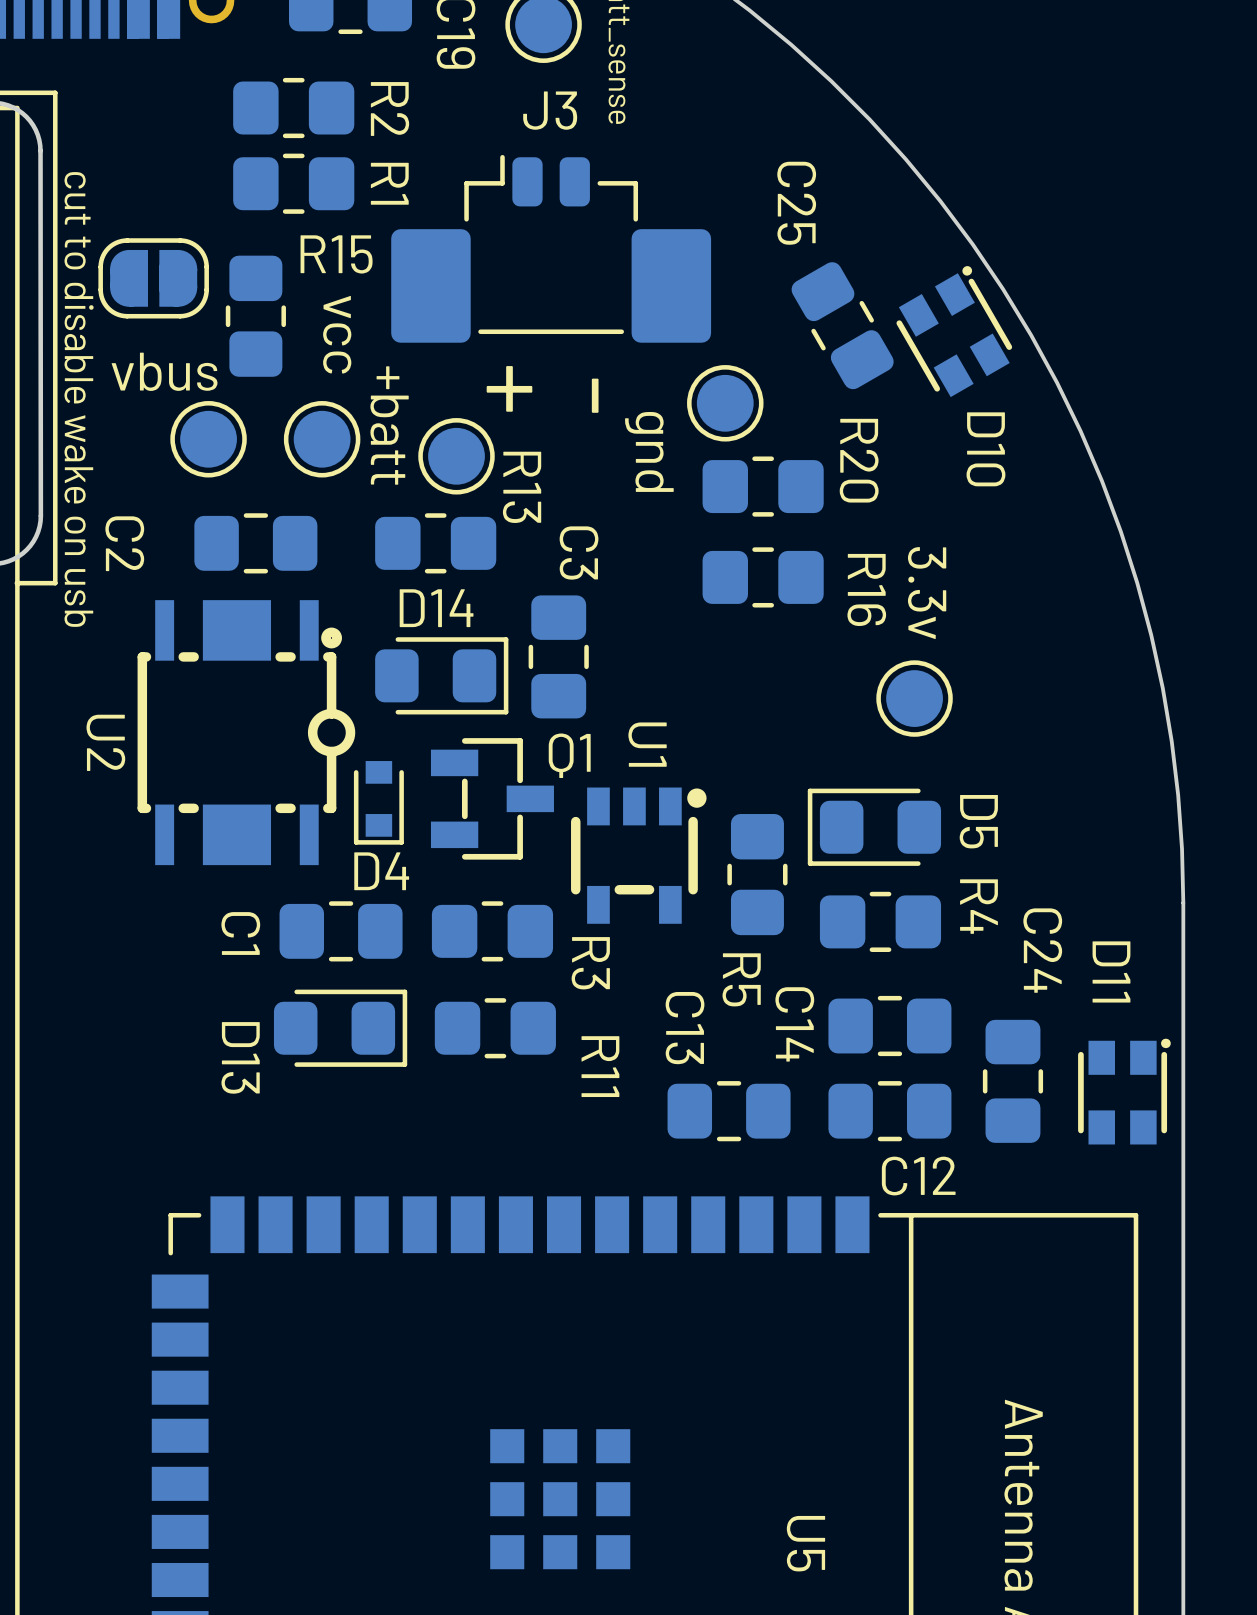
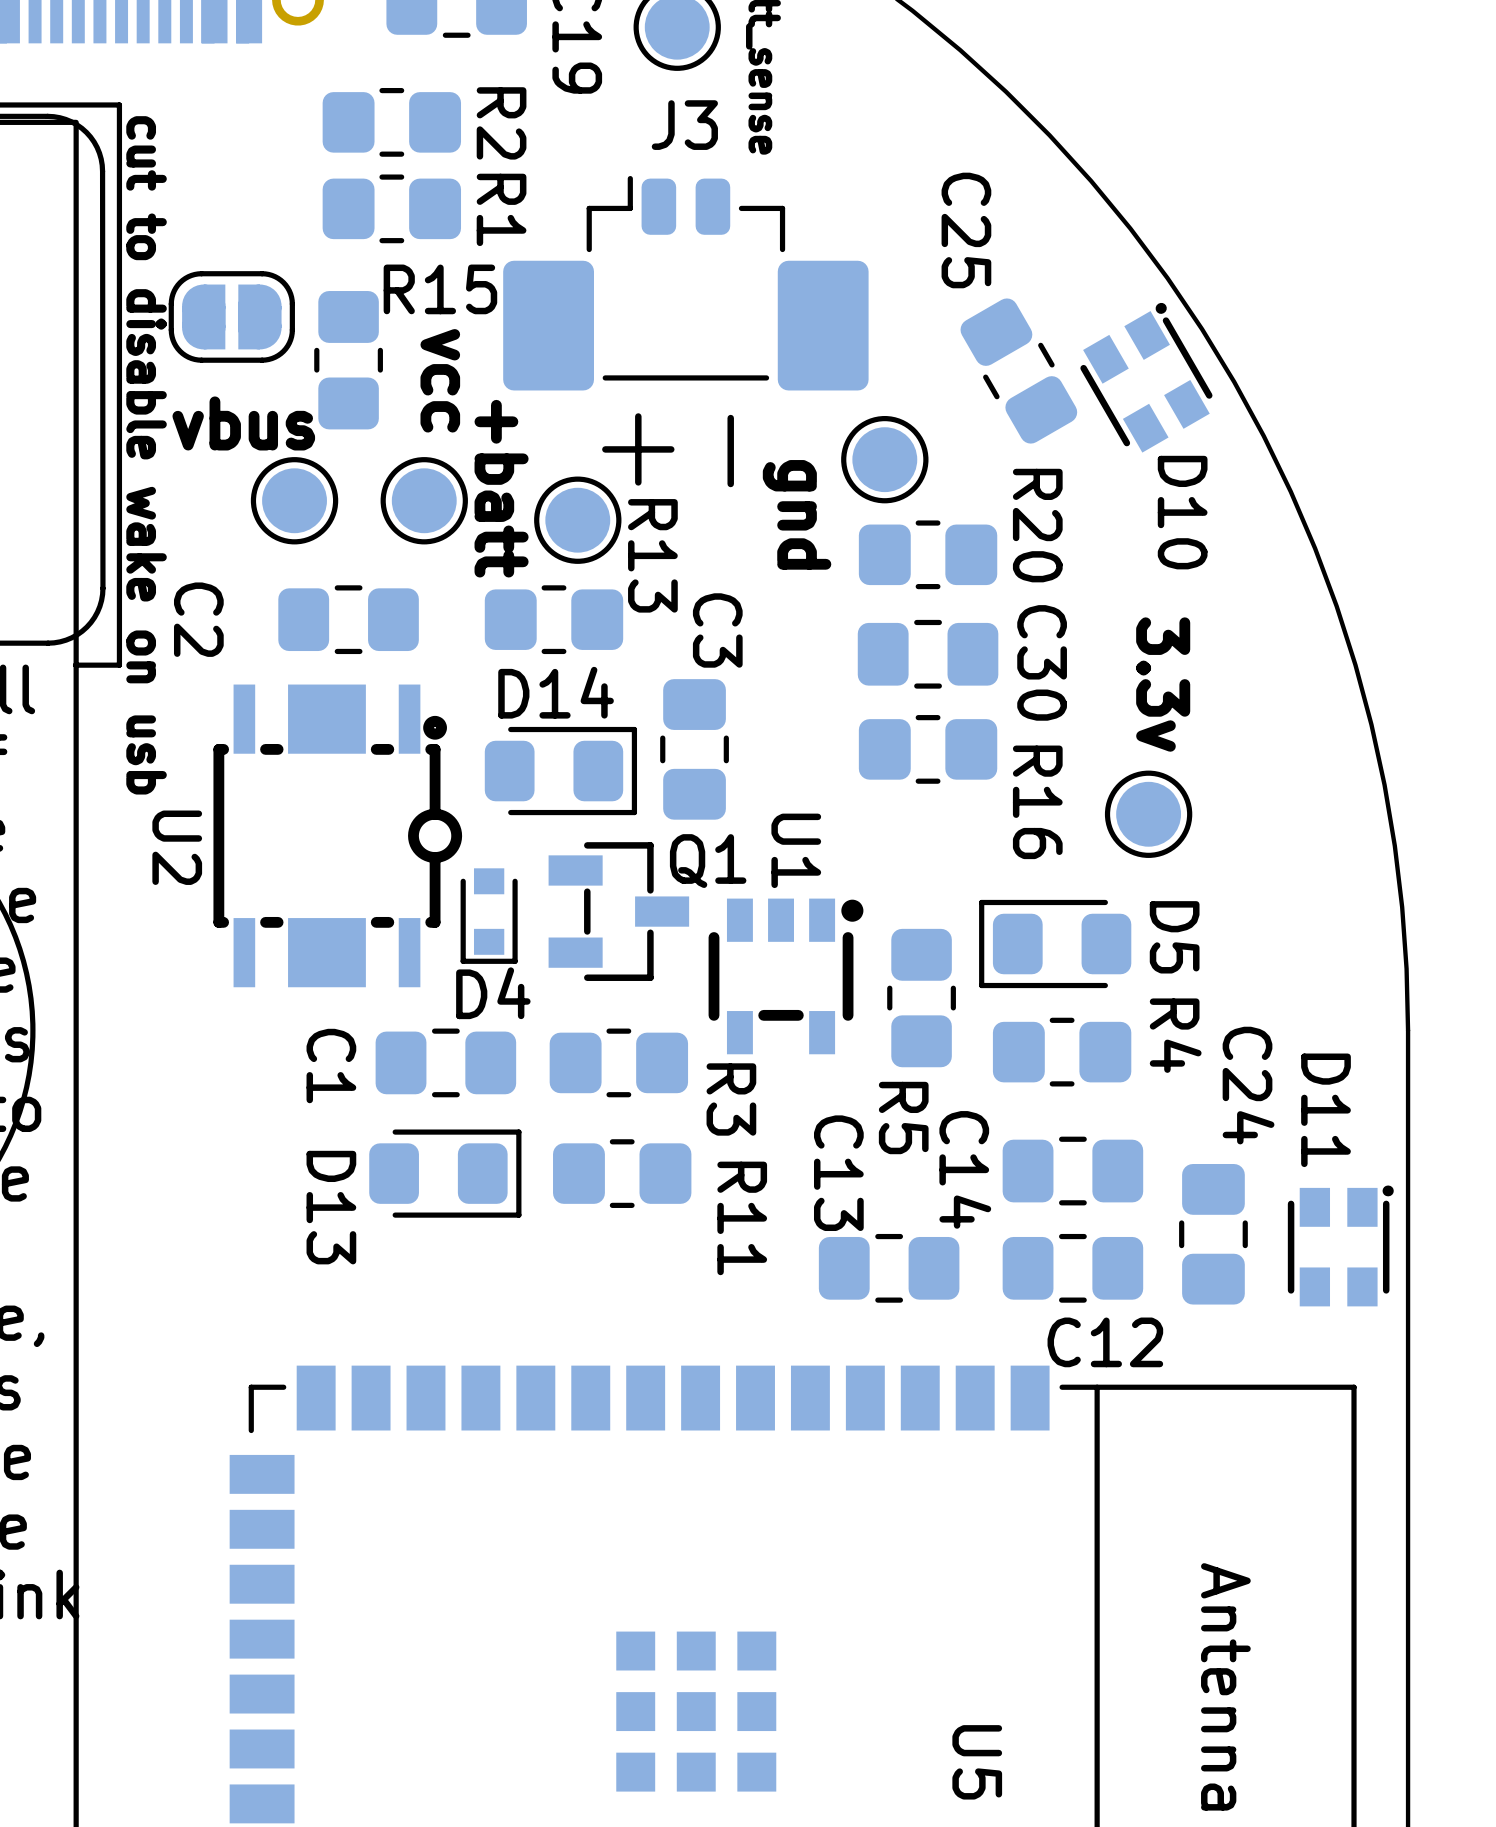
C30: none -> (928, 654)
R16 position: (763, 577) -> (928, 749)
R16 name position: R16 (866, 589) -> R16 (1037, 802)
text position: 3.3v (927, 593) -> 3.3v (1163, 684)
part position: (914, 698) -> (1148, 814)

